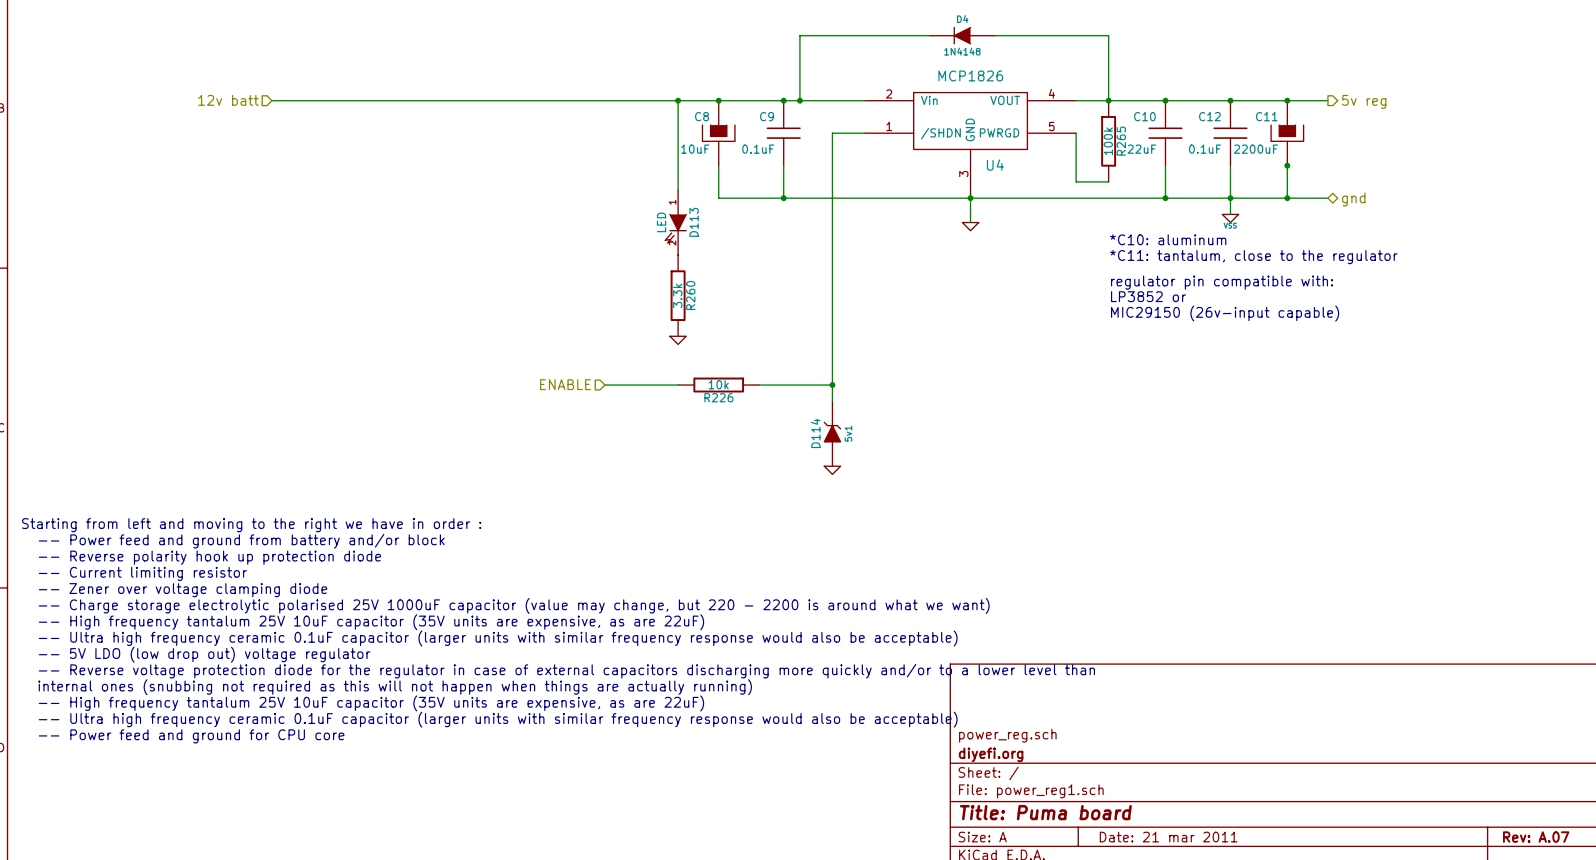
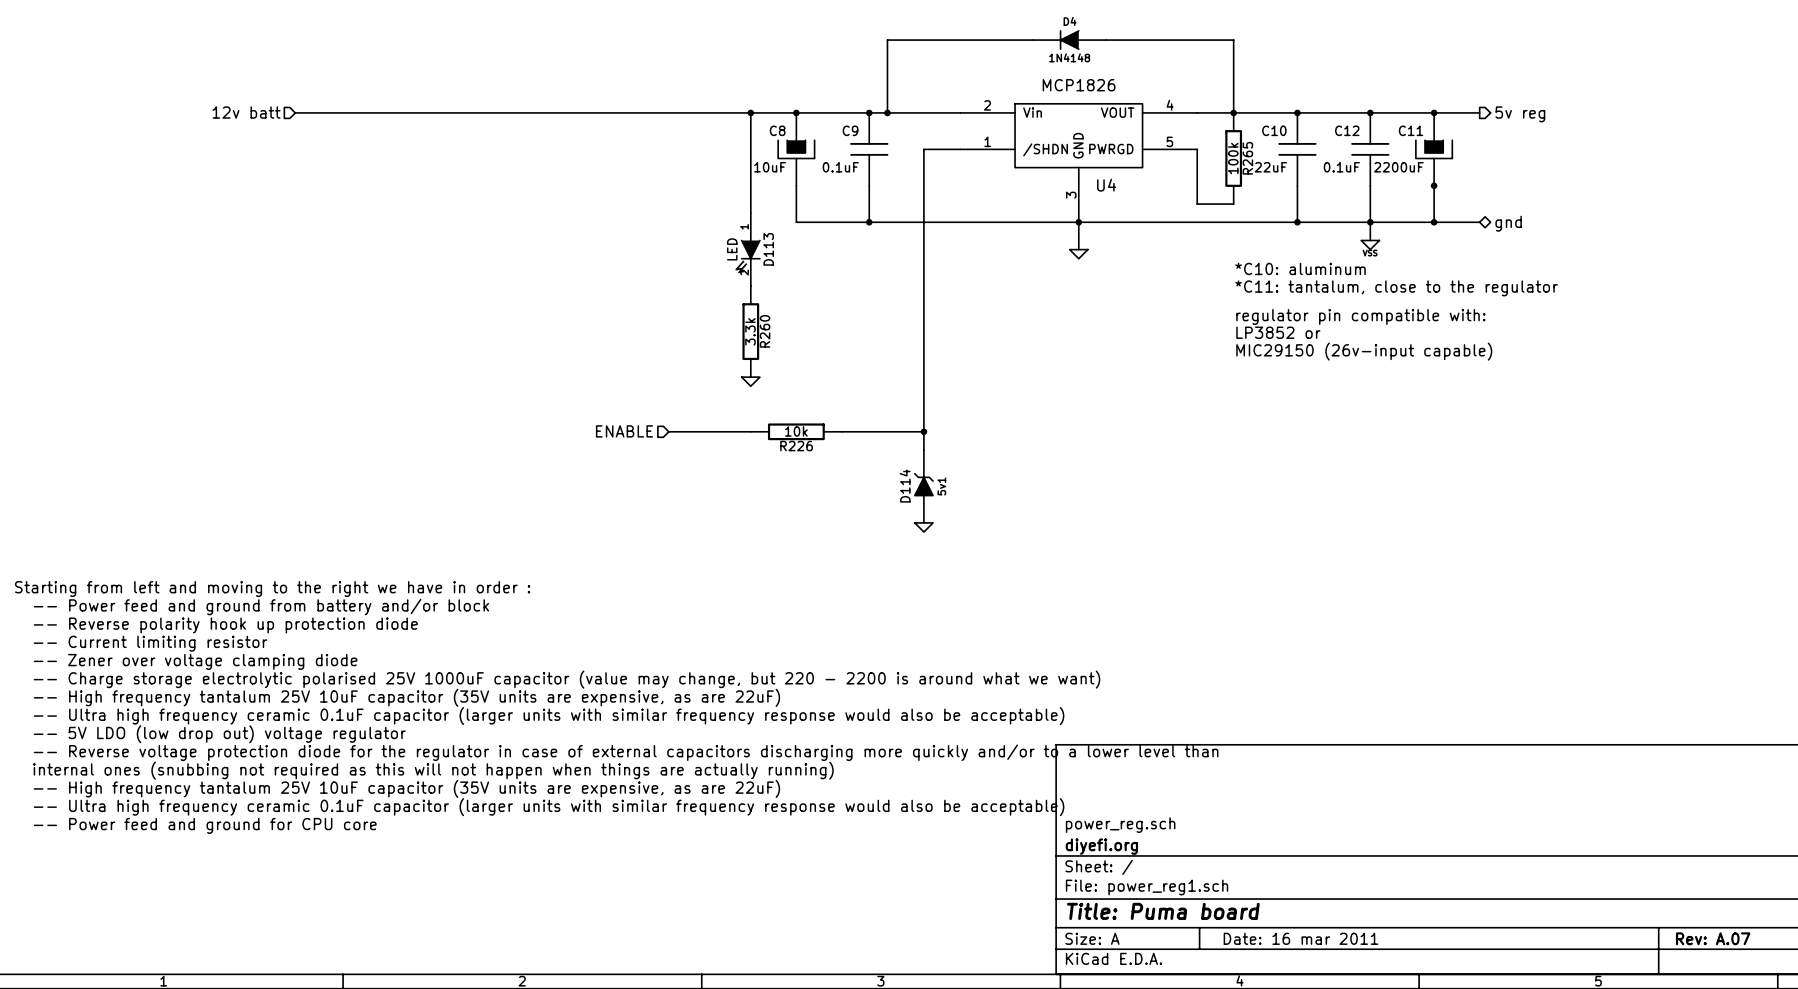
title block: Date: 21 mar 2011 (1168, 837) -> Date: 16 mar 2011 (1301, 938)

